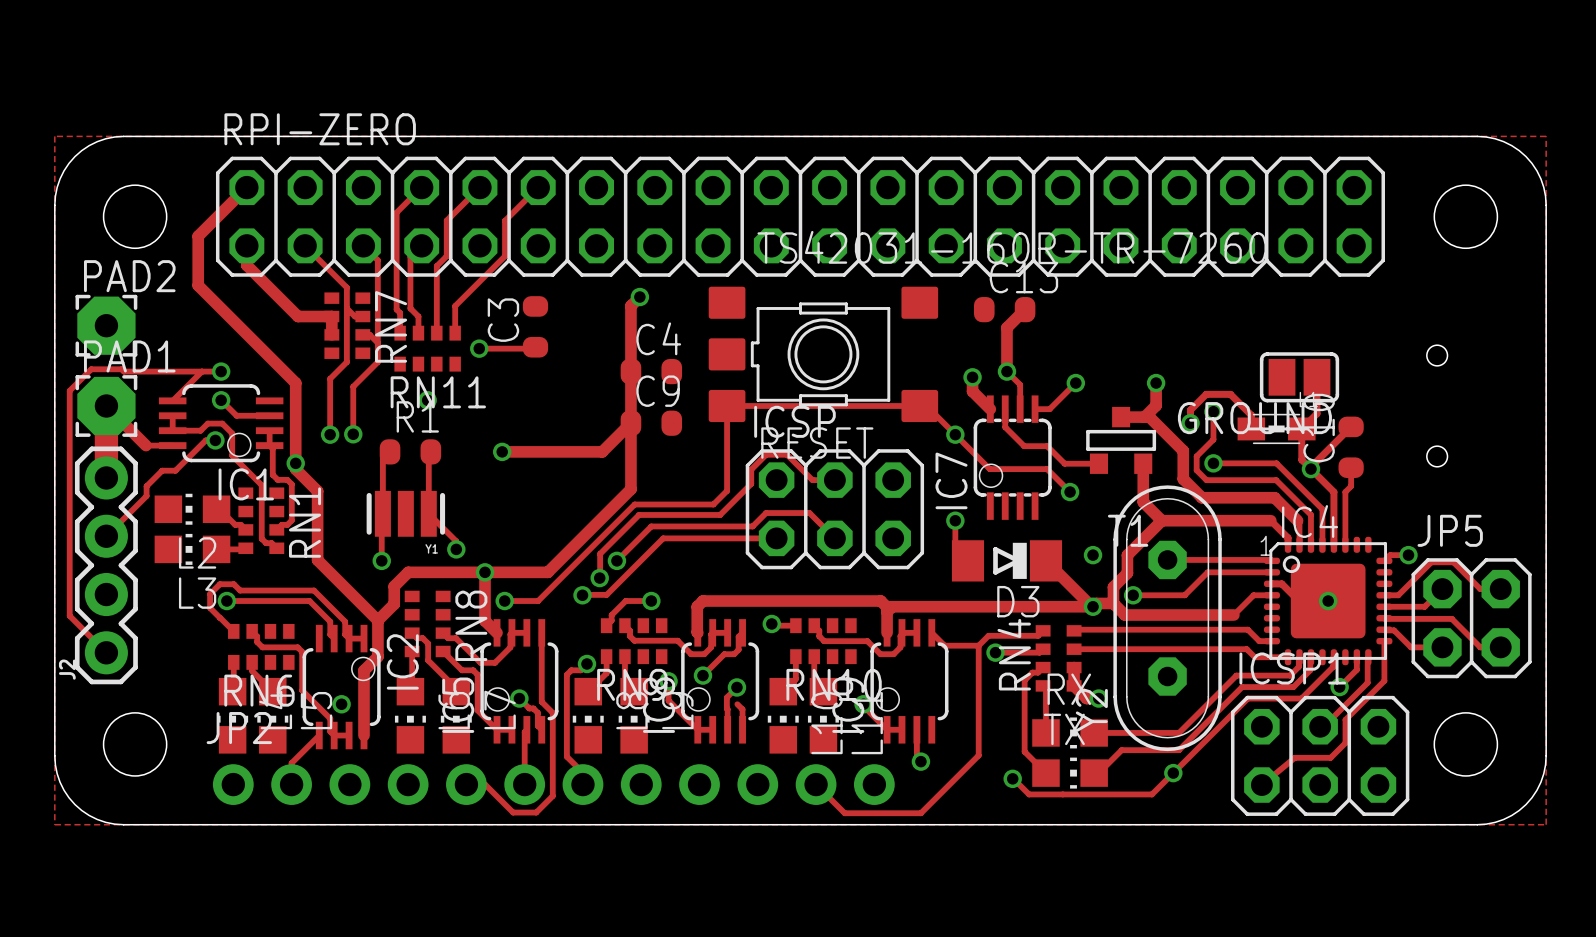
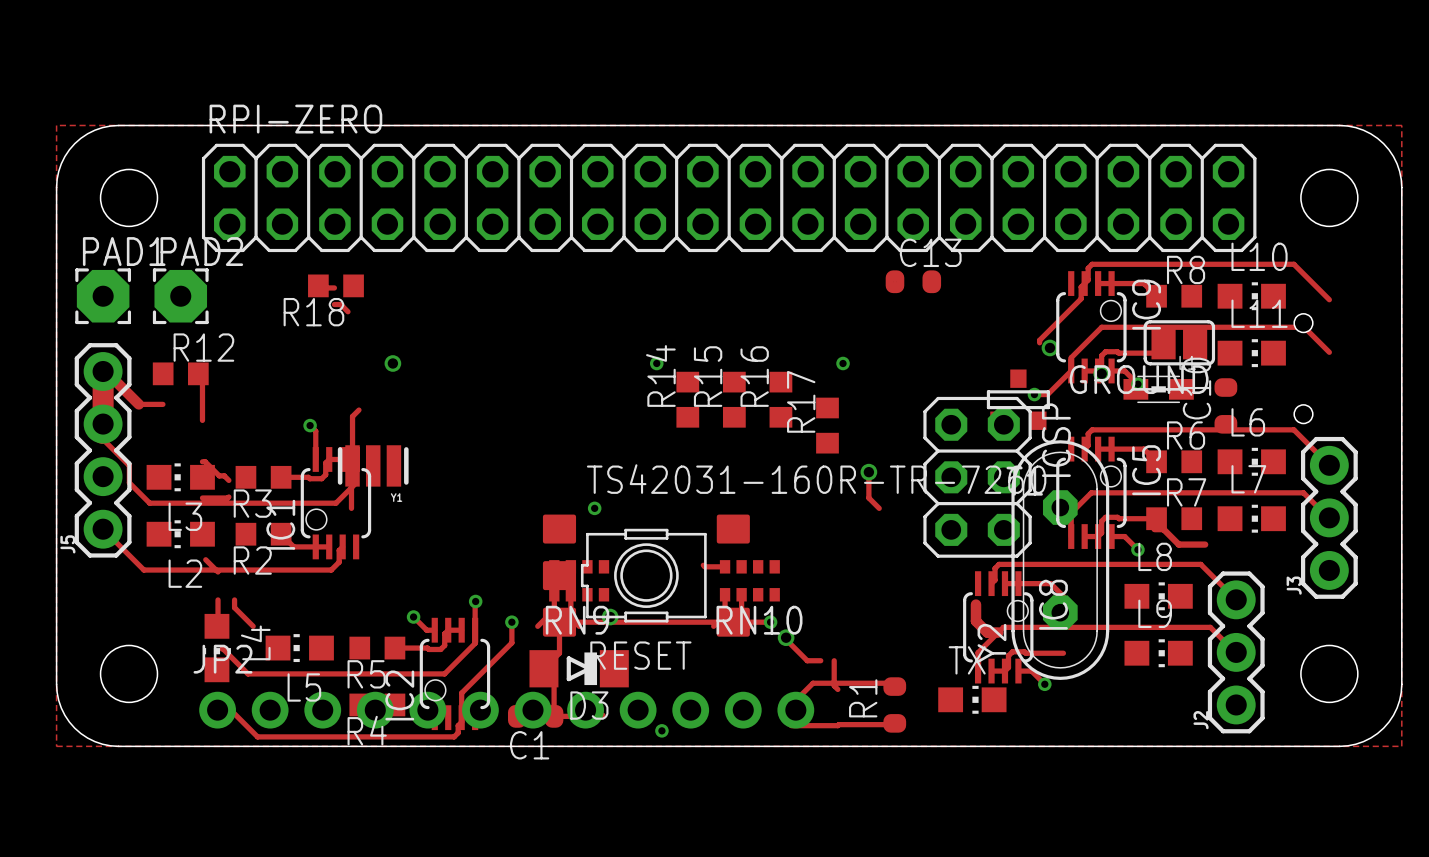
track: (246, 187) (198, 236) (198, 285) (295, 383) (295, 469) (317, 491) (317, 560) (377, 620) -> none
track: (421, 187) (396, 212) (396, 309) (400, 313) (400, 333) -> none
track: (479, 187) (450, 216) -> none
track: (538, 187) (505, 220) (505, 256) (455, 306) (455, 333) -> none
track: (450, 216) (446, 220) (446, 256) (436, 266) (436, 333) -> none
track: (246, 245) (246, 265) (298, 316) (331, 316) (331, 334) -> none
track: (305, 245) (346, 287) (346, 362) (330, 378) (330, 434) -> none
track: (363, 245) (377, 260) (377, 362) (353, 386) (353, 434) -> none
track: (421, 245) (410, 256) (410, 308) (418, 316) (418, 333) -> none
PAD2 name: PAD2 (129, 276) -> PAD1 (124, 251)
track: (639, 297) (630, 305) (630, 489) (547, 572) (408, 572) (394, 586) (394, 604) (377, 620) -> none
via: (639, 297) -> none
track: (1025, 309) (1006, 327) (1006, 371) (1020, 384) (1020, 409) -> none
track: none -> (1098, 283) (1143, 283) (1156, 296)
R18: none -> (335, 285)
PAD2: none -> (180, 296)
RN7: (347, 325) -> none
R8: none -> (1174, 296)
C3: (535, 326) -> none
track: none -> (1329, 299) (1293, 264) (1092, 264) (1088, 268) (1088, 280) (1081, 287) (1081, 298) (1039, 340) (1039, 342)
track: (535, 347) (479, 348) -> none
RN11: (427, 348) -> none
via: (479, 348) -> none
RESET position: (823, 354) -> (646, 575)
track: (201, 371) (172, 400) -> none
track: (221, 371) (123, 371) (121, 369) (91, 369) (69, 390) (69, 615) (106, 652) -> none
via: (221, 371) -> none
C4: (651, 371) -> none
via: (1006, 371) -> none
track: (972, 377) (972, 391) (990, 409) -> none
via: (972, 377) -> none
track: (1316, 377) (1316, 413) (1301, 428) (1301, 459) (1333, 492) (1333, 544) -> none
track: (1075, 383) (1049, 409) (1035, 409) -> none
via: (1075, 383) -> none
track: (1156, 383) (1156, 405) (1144, 417) -> none
track: none -> (1329, 352) (1304, 327) (1101, 327) (1071, 357) (1071, 370) (1047, 394) (1034, 394)
track: none -> (1156, 353) (1105, 351) (1101, 355) (1101, 367) (1098, 370) (1084, 370)
track: (221, 400) (236, 415) (269, 415) -> none
via: (221, 400) -> none
via: none -> (656, 363)
via: none -> (843, 363)
PAD1: (106, 406) -> none
track: none -> (1111, 370) (1124, 370) (1137, 384)
track: (1005, 409) (1005, 427) (1024, 446) (1047, 446) (1064, 463) (1098, 463) -> none
R12: none -> (180, 373)
track: none -> (198, 373) (202, 377) (202, 420)
track: (1213, 411) (1213, 439) (1196, 456) (1196, 470) (1206, 480) (1276, 480) (1310, 514) (1310, 544) -> none
track: (172, 415) (172, 430) (200, 430) (207, 423) (222, 423) (232, 433) (232, 455) (261, 485) (261, 538) (266, 543) (271, 543) (276, 548) -> none
R1 name position: R1 (417, 416) -> R1 (863, 698)
track: (1121, 417) (1149, 417) (1183, 450) (1183, 479) (1202, 497) (1274, 497) (1299, 522) (1299, 544) -> none
IC1 rotation: 0° (221, 423) -> 90° clockwise (335, 503)
IC1 position: (221, 423) -> (335, 503)
track: (630, 423) (602, 451) (502, 451) -> none
C9: (651, 423) -> none
track: (1190, 423) (1190, 410) (1206, 394) (1230, 394) (1251, 415) (1251, 428) -> none
via: (1190, 423) -> none
via: none -> (1137, 384)
track: (1351, 426) (1310, 469) -> none
track: (269, 430) (269, 445) (272, 448) (272, 474) (277, 479) (287, 479) (291, 484) (291, 520) (287, 524) (281, 524) (276, 529) -> none
via: (330, 434) -> none
via: (353, 434) -> none
via: (955, 434) -> none
via: none -> (1034, 394)
track: (215, 440) (205, 440) (175, 470) (162, 470) (146, 486) (146, 496) (106, 536) -> none
via: (215, 440) -> none
R14: none -> (687, 399)
R15: none -> (734, 399)
R16: none -> (780, 399)
J2 footprint: [74, 446, 138, 685] -> [1207, 571, 1265, 734]
R1 rotation: 0° (410, 451) -> 90° clockwise (894, 704)
R1 position: (410, 451) -> (894, 704)
track: (430, 451) (428, 453) (428, 513) (456, 541) (456, 549) -> none
via: (502, 451) -> none
IC7: (1012, 457) -> none
via: (295, 463) -> none
track: (1143, 463) (1143, 502) (1161, 520) -> none
track: (1213, 463) (1276, 463) (1322, 509) (1322, 544) -> none
via: (1213, 463) -> none
track: none -> (103, 424) (103, 439) (129, 465) (129, 482) (149, 503) (335, 503) (356, 483) (356, 459)
track: (1351, 467) (1351, 486) (1345, 492) (1345, 544) -> none
track: none -> (310, 425) (315, 431) (315, 459)
via: none -> (310, 425)
R17: none -> (827, 425)
via: (1310, 469) -> none
track: (834, 480) (812, 480) (787, 454) (766, 454) (751, 469) (751, 483) (720, 514) (639, 514) (600, 553) (599, 578) -> none
track: (1070, 492) (1047, 469) (989, 469) (926, 406) (727, 406) (727, 490) (713, 504) (634, 504) (538, 601) (504, 601) -> none
via: (1070, 492) -> none
track: none -> (1084, 449) (1088, 445) (1088, 433) (1092, 429) (1293, 429) (1329, 465)
track: none -> (1098, 449) (1143, 449) (1156, 461)
J5: none -> (103, 450)
track: none -> (342, 459) (329, 459) (325, 462) (325, 474) (321, 478) (281, 477)
L2 position: (192, 509) -> (180, 534)
ICSP rotation: 0° (834, 509) -> 90° clockwise (977, 477)
ICSP position: (834, 509) -> (977, 477)
R6: none -> (1174, 461)
RN1: (261, 520) -> none
track: (1161, 520) (1127, 555) (1127, 573) (1113, 587) (1113, 603) -> none
track: (1161, 520) (1270, 520) (1288, 537) (1288, 544) -> none
R3: none -> (263, 477)
track: (776, 538) (663, 538) (606, 594) (582, 595) -> none
track: (834, 538) (809, 513) (766, 513) (752, 526) (651, 526) (616, 560) -> none
L3 position: (192, 549) -> (180, 477)
via: (456, 549) -> none
via: (1093, 555) -> none
track: (1408, 555) (1390, 555) (1384, 560) -> none
via: (1408, 555) -> none
track: (1167, 559) (1271, 560) -> none
via: (381, 560) -> none
via: (616, 560) -> none
via: none -> (594, 508)
D3 position: (1006, 560) -> (579, 668)
track: (1045, 560) (1091, 606) -> none
track: none -> (1329, 517) (1303, 492) (1091, 492) (1071, 513) (1071, 536)
J3: none -> (1329, 517)
track: (485, 572) (485, 620) (497, 632) -> none
via: (485, 572) -> none
track: (1232, 572) (1207, 572) (1184, 595) (1133, 595) -> (1118, 518) (1105, 517) (1101, 521) (1101, 533) (1098, 536) (1084, 536)
R7: none -> (1174, 518)
via: (599, 578) -> none
track: none -> (103, 529) (143, 570) (331, 570) (339, 562) (339, 550) (342, 546)
R2: none -> (263, 534)
track: none -> (281, 534) (293, 546) (329, 546)
track: (1442, 589) (1424, 606) (1384, 606) -> none
track: (1500, 589) (1480, 589) (1453, 562) (1431, 562) (1398, 595) (1384, 595) -> none
track: none -> (1111, 536) (1124, 536) (1137, 549)
via: (582, 595) -> none
via: (1133, 595) -> none
track: (1271, 595) (1253, 595) (1233, 615) (1125, 615) (1113, 603) -> none
track: (226, 601) (309, 601) (330, 621) (330, 634) (334, 638) -> none
via: (226, 601) -> none
via: (504, 601) -> none
track: (651, 601) (625, 601) (611, 615) (611, 620) (606, 625) -> none
via: (651, 601) -> none
IC4: (1328, 601) -> none
via: (1328, 601) -> none
track: (1113, 603) (1096, 603) (1093, 606) (886, 606) (880, 601) (702, 601) (697, 606) (697, 632) -> none
track: (892, 606) (887, 611) (887, 632) -> none
via: (1093, 606) -> none
via: none -> (1137, 549)
track: (219, 617) (210, 607) (210, 594) (219, 584) (233, 584) (240, 590) (314, 590) (345, 621) (345, 634) (349, 638) (364, 638) -> none
track: (1384, 618) (1451, 618) (1480, 647) (1500, 647) -> none
JP5: (1471, 618) -> none
track: (377, 620) (377, 656) (364, 670) (364, 735) -> none
RN8: (427, 623) -> none
via: (771, 623) -> none
track: (624, 625) (630, 630) (630, 636) (634, 640) (677, 640) (691, 654) (704, 654) (711, 647) (712, 632) (727, 632) -> none
track: (814, 625) (819, 630) (819, 636) (824, 641) (867, 641) (880, 654) (893, 654) (900, 647) (900, 636) (903, 632) -> none
track: (1384, 629) (1394, 630) (1411, 647) (1442, 647) -> none
track: (1043, 630) (1038, 635) (988, 635) (978, 645) -> none
track: (1074, 630) (1247, 629) (1259, 641) (1271, 641) -> none
track: (252, 631) (257, 636) (257, 642) (262, 647) (297, 647) (302, 651) (302, 690) (330, 718) (330, 731) (334, 735) (349, 735) -> none
track: (526, 632) (511, 632) (510, 647) (495, 662) (480, 662) (455, 638) (448, 638) (443, 633) -> none
track: (541, 632) (541, 701) (552, 712) (552, 796) (536, 812) (513, 812) (485, 784) (466, 784) -> none
track: (742, 632) (738, 636) (738, 649) (734, 654) (724, 654) (702, 675) -> none
track: (901, 632) (916, 632) -> none
track: (931, 632) (944, 645) (978, 645) -> none
track: (412, 633) (417, 638) (422, 638) (428, 643) (428, 660) (456, 688) (456, 691) -> none
track: (1384, 641) (1384, 680) (1345, 719) (1345, 742) (1330, 757) (1294, 757) (1261, 785) -> none
track: none -> (991, 583) (995, 580) (995, 568) (999, 564) (1200, 564) (1236, 599)
track: none -> (1004, 583) (1050, 583) (1063, 596)
track: (978, 645) (978, 755) (920, 813) (844, 813) (816, 784) -> none
RN6: (261, 646) -> none
track: (1043, 649) (1039, 652) (995, 652) -> none
track: (1074, 649) (1246, 649) (1254, 657) (1288, 657) -> none
track: (412, 651) (412, 689) (410, 691) -> none
track: (443, 651) (461, 670) (473, 670) (477, 674) (477, 710) (497, 729) (511, 729) -> none
via: (995, 652) -> none
track: (1299, 657) (1298, 666) (1290, 675) (1236, 675) (1179, 732) (1094, 732) -> none
track: (1310, 657) (1310, 670) (1293, 687) (1242, 687) (1179, 750) (1121, 750) (1098, 773) (1094, 773) -> none
track: (1333, 657) (1333, 666) (1301, 698) (1247, 698) (1151, 794) (1029, 794) (1012, 778) -> none
track: (1356, 657) (1356, 669) (1339, 687) -> none
track: (1368, 657) (1367, 682) (1320, 730) (1320, 726) -> none
RN4: (1058, 658) -> none
track: (586, 663) (580, 670) (571, 670) (566, 674) (566, 756) (582, 772) (582, 784) -> none
via: (586, 663) -> none
track: none -> (475, 601) (475, 643) (444, 673) (248, 673) (222, 648)
via: none -> (475, 601)
track: (1043, 667) (1038, 672) (1032, 672) (1024, 680) (1024, 751) (1045, 773) -> none
via: (702, 675) -> none
track: none -> (413, 617) (426, 630) (434, 630)
via: none -> (413, 617)
IC5 rotation: 0° (519, 681) -> 180° (1091, 492)
IC5 position: (519, 681) -> (1091, 492)
track: (668, 681) (668, 700) (697, 729) (712, 729) -> none
IC8 rotation: 0° (720, 681) -> 180° (998, 627)
IC8 position: (720, 681) -> (998, 627)
IC9 rotation: 0° (909, 681) -> 180° (1091, 327)
IC9 position: (909, 681) -> (1091, 327)
track: (1043, 685) (1045, 688) (1045, 732) -> none
IC2 rotation: 0° (341, 687) -> 180° (454, 673)
IC2 position: (341, 687) -> (454, 673)
track: none -> (511, 622) (511, 642) (461, 693) (461, 722) (458, 725) (458, 732) (454, 736) (257, 736) (222, 701)
via: none -> (511, 622)
track: (736, 687) (726, 697) (727, 729) -> none
via: (736, 687) -> none
track: none -> (770, 622) (559, 622) (559, 653) (543, 668) (554, 678) (554, 716) (602, 715)
via: none -> (770, 622)
via: (1339, 687) -> none
track: none -> (461, 630) (448, 630) (444, 633) (444, 645) (440, 649) (394, 648)
track: (519, 698) (529, 708) (533, 708) (537, 712) (537, 725) (541, 729) -> none
via: (519, 698) -> none
via: (1098, 698) -> none
via: (341, 704) -> none
track: (737, 704) (742, 709) (742, 729) -> none
L5 rotation: 0° (272, 715) -> 90° clockwise (299, 648)
L5 position: (272, 715) -> (299, 648)
L6 rotation: 0° (410, 715) -> 90° counterclockwise (1251, 461)
L6 position: (410, 715) -> (1251, 461)
R5: none -> (377, 648)
L7 rotation: 0° (456, 715) -> 90° counterclockwise (1251, 518)
L7 position: (456, 715) -> (1251, 518)
L8 rotation: 0° (588, 715) -> 90° counterclockwise (1158, 596)
L8 position: (588, 715) -> (1158, 596)
L9 rotation: 0° (634, 715) -> 90° counterclockwise (1158, 653)
L9 position: (634, 715) -> (1158, 653)
L10 rotation: 0° (783, 715) -> 90° counterclockwise (1251, 296)
L10 position: (783, 715) -> (1251, 296)
L11 rotation: 0° (823, 715) -> 90° counterclockwise (1251, 353)
L11 position: (823, 715) -> (1251, 353)
track: none -> (1236, 652) (1210, 627) (1003, 627) (978, 652) (978, 671)
track: none -> (1063, 653) (1012, 651) (1008, 655) (1008, 667) (1004, 671) (991, 671)
track: (526, 729) (524, 731) (524, 784) -> none
RX: (1070, 732) -> none
track: (319, 735) (291, 763) (291, 784) -> none
track: none -> (1018, 671) (1031, 671) (1044, 684)
via: none -> (1044, 684)
ICSP1: (1320, 755) -> none
track: none -> (894, 686) (891, 683) (813, 683) (791, 704)
via: (920, 761) -> none
via: (1173, 773) -> none
R4: none -> (377, 704)
via: (1012, 778) -> none
C1: none -> (535, 716)
track: none -> (894, 723) (791, 725)
via: none -> (661, 730)

